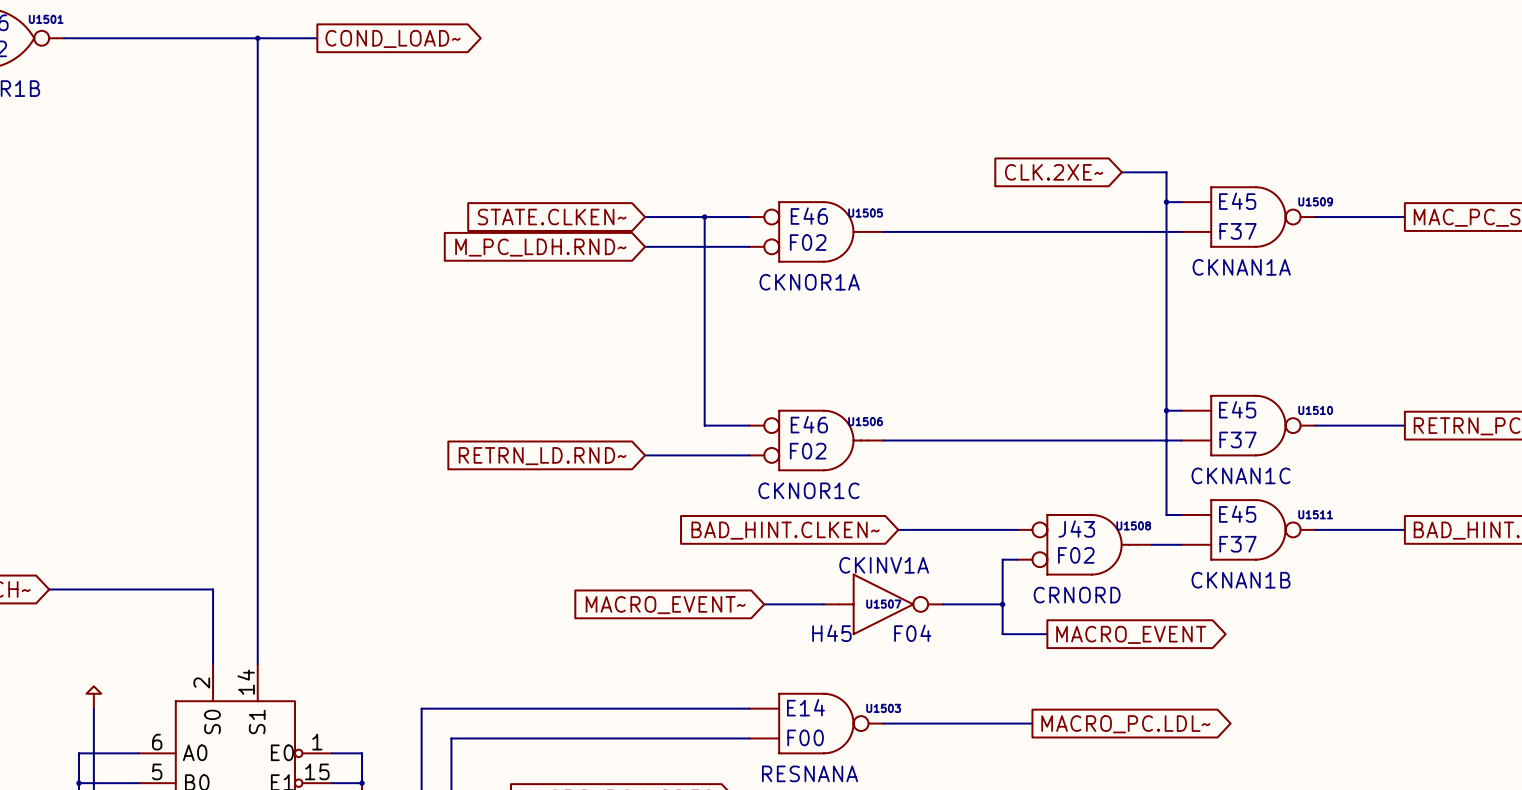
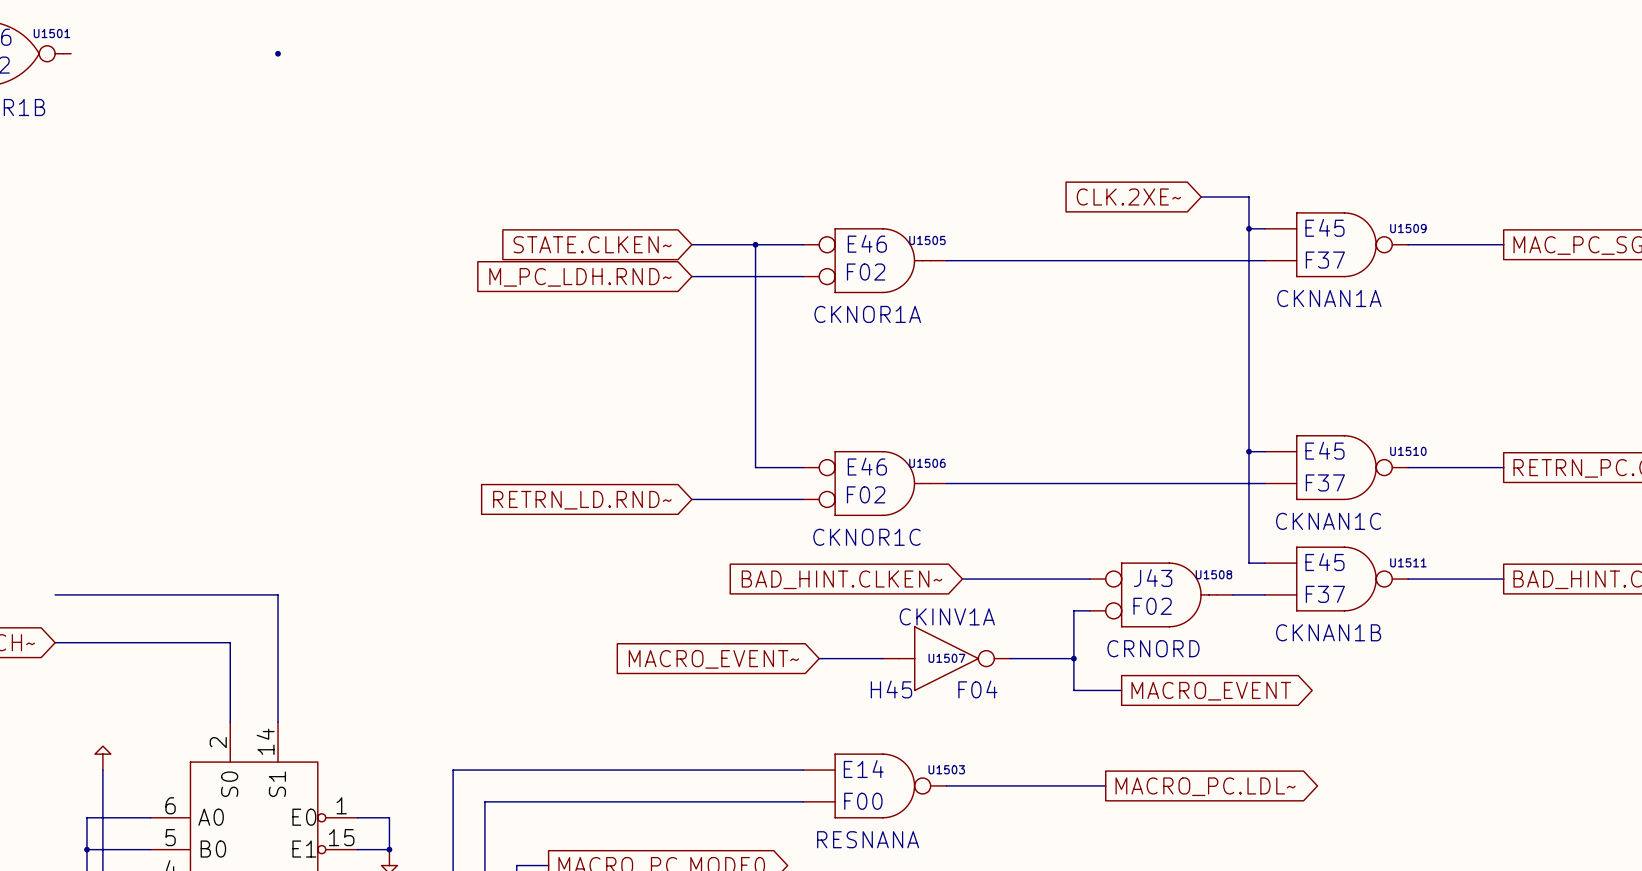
wire: (64, 38) (317, 38) -> none
wire: (257, 38) (257, 544) -> (55, 594) (278, 594)
global label: COND_LOAD~ (393, 38) -> none

